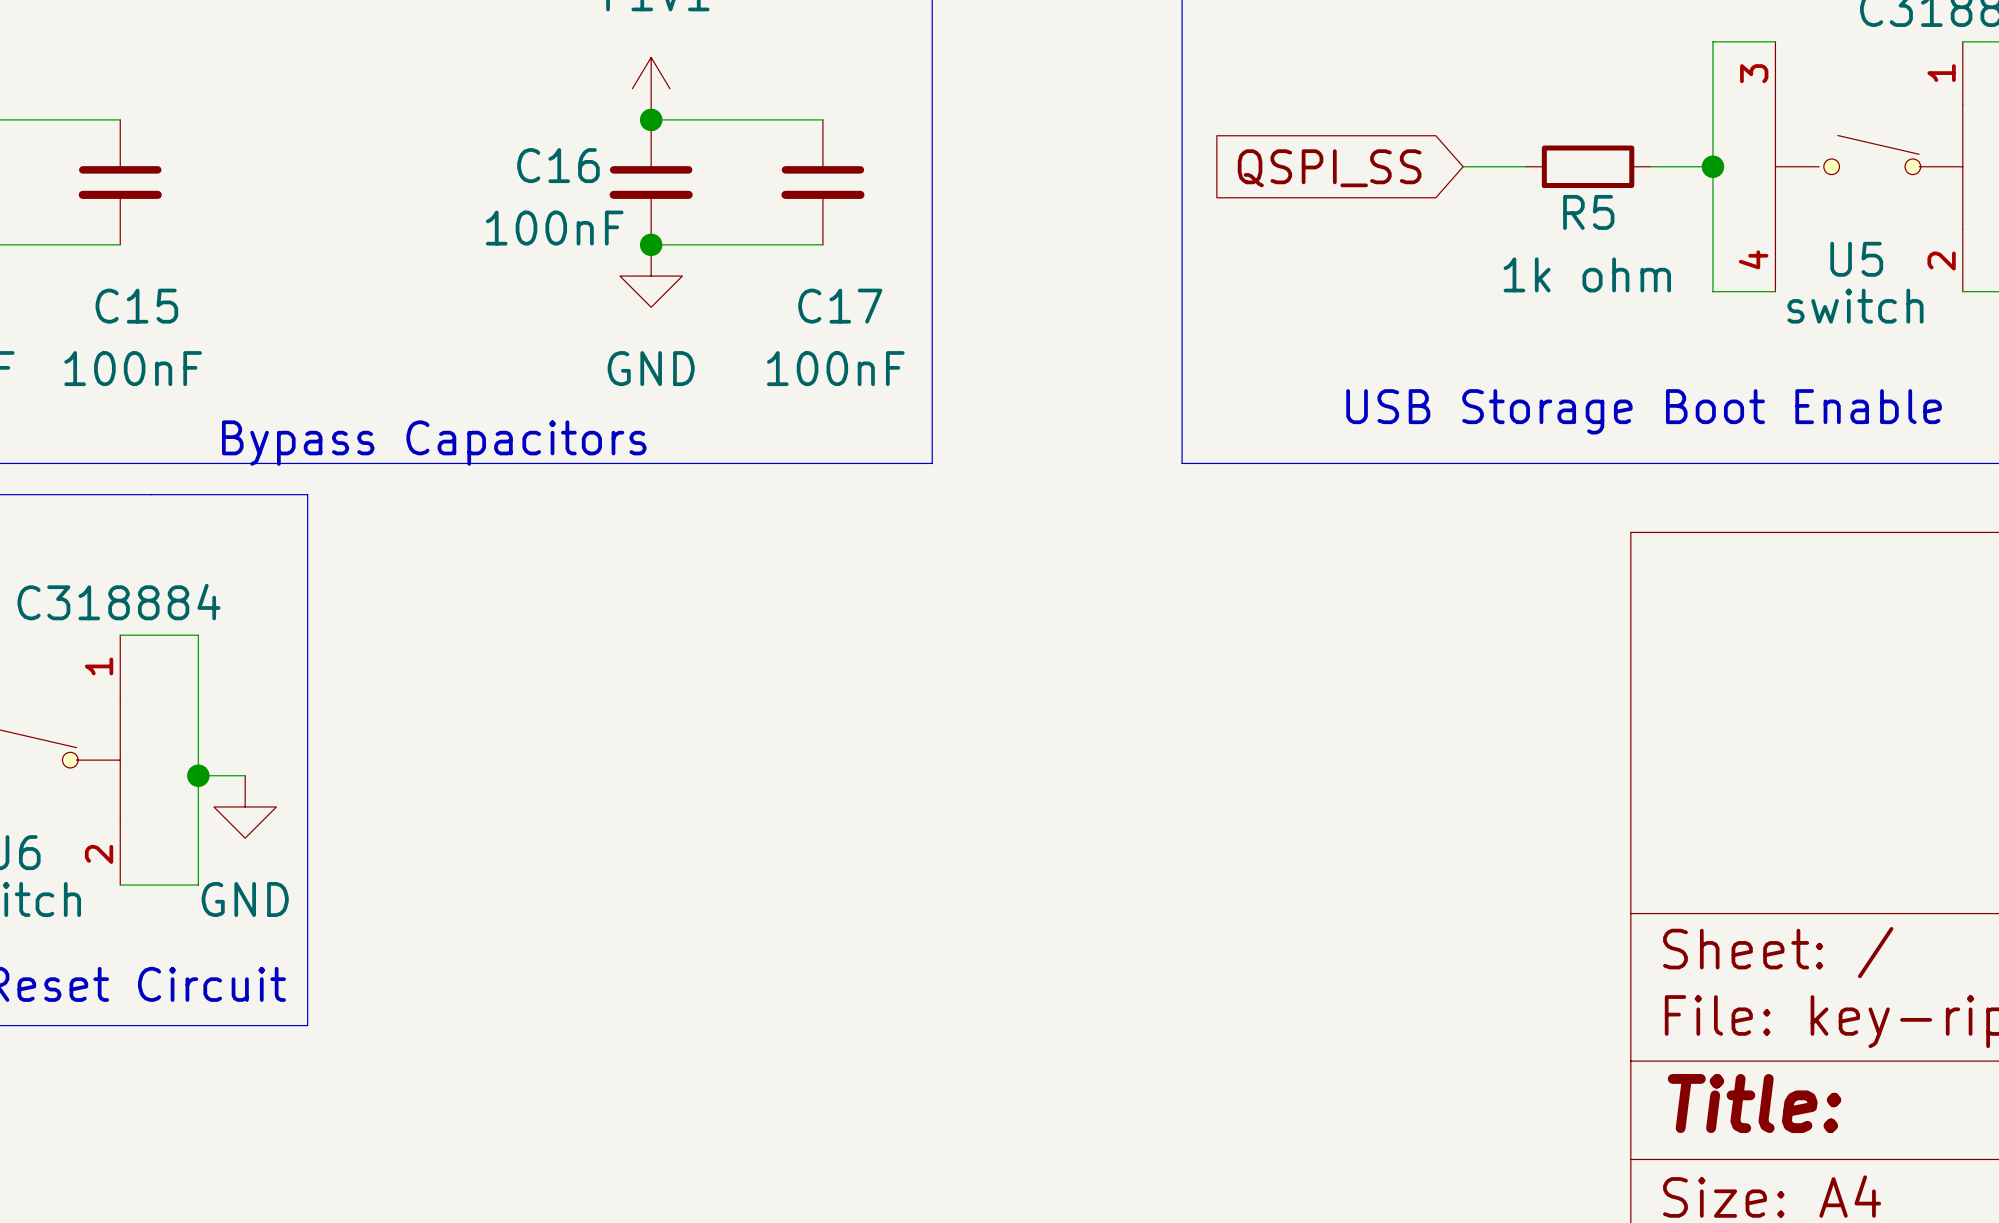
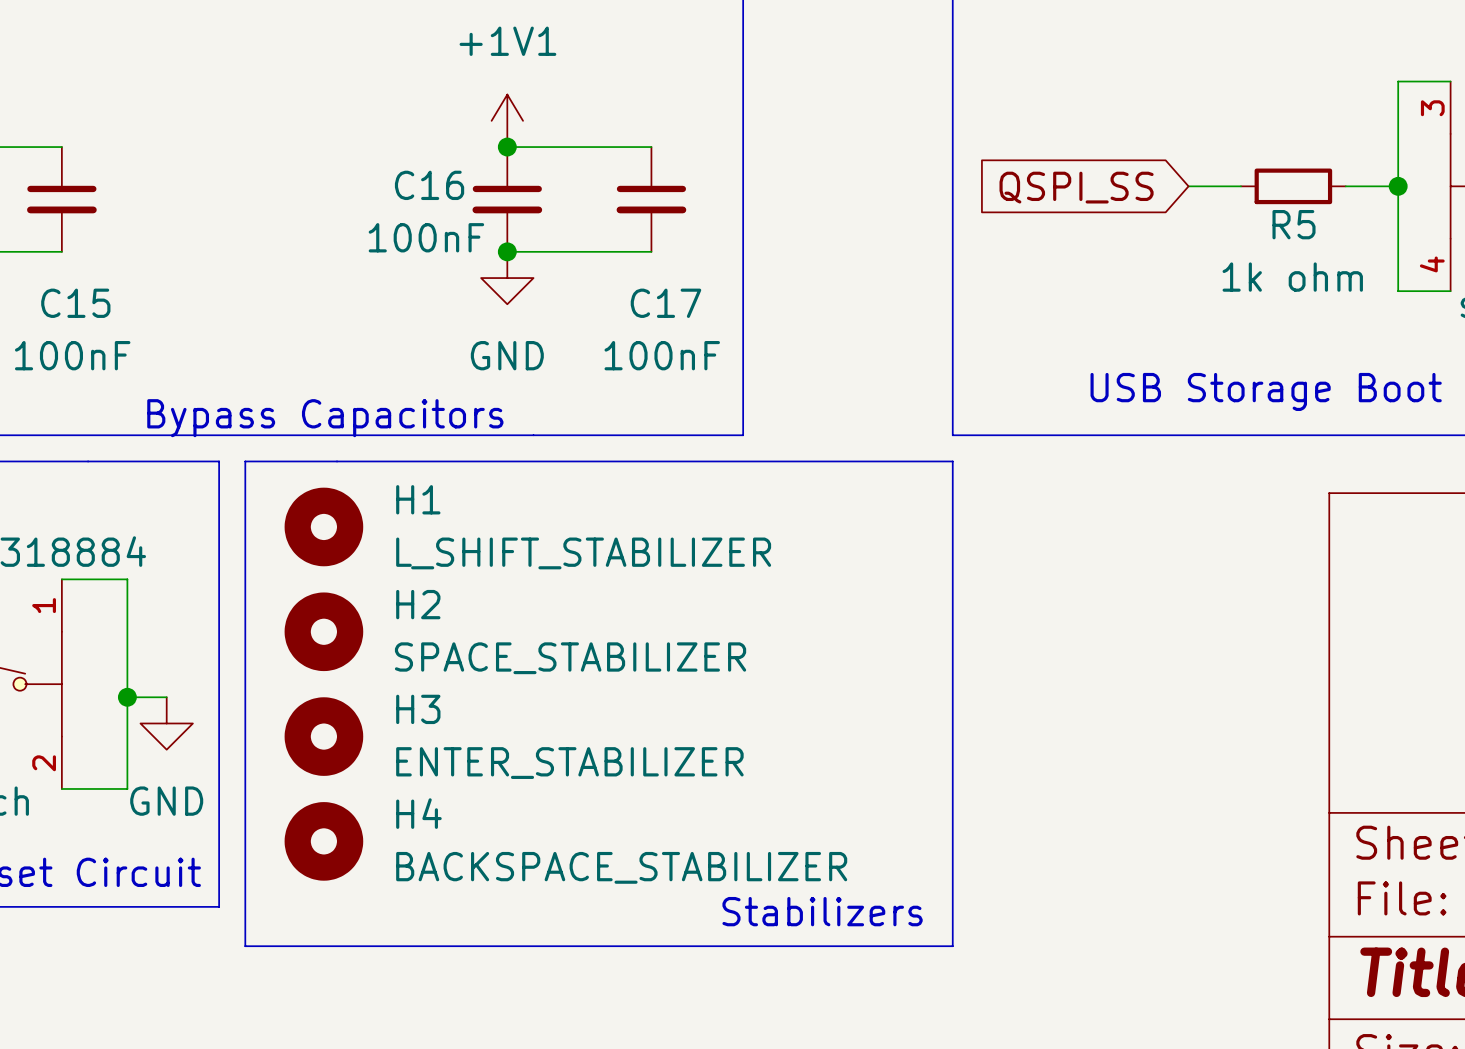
line: none -> (245, 461) (952, 461) (952, 946) (245, 946) (245, 461)
H1: none -> L_SHIFT_STABILIZER (323, 526)
H2: none -> SPACE_STABILIZER (323, 631)
H3: none -> ENTER_STABILIZER (323, 736)
H4: none -> BACKSPACE_STABILIZER (323, 841)
text: none -> Stabilizers (822, 911)

